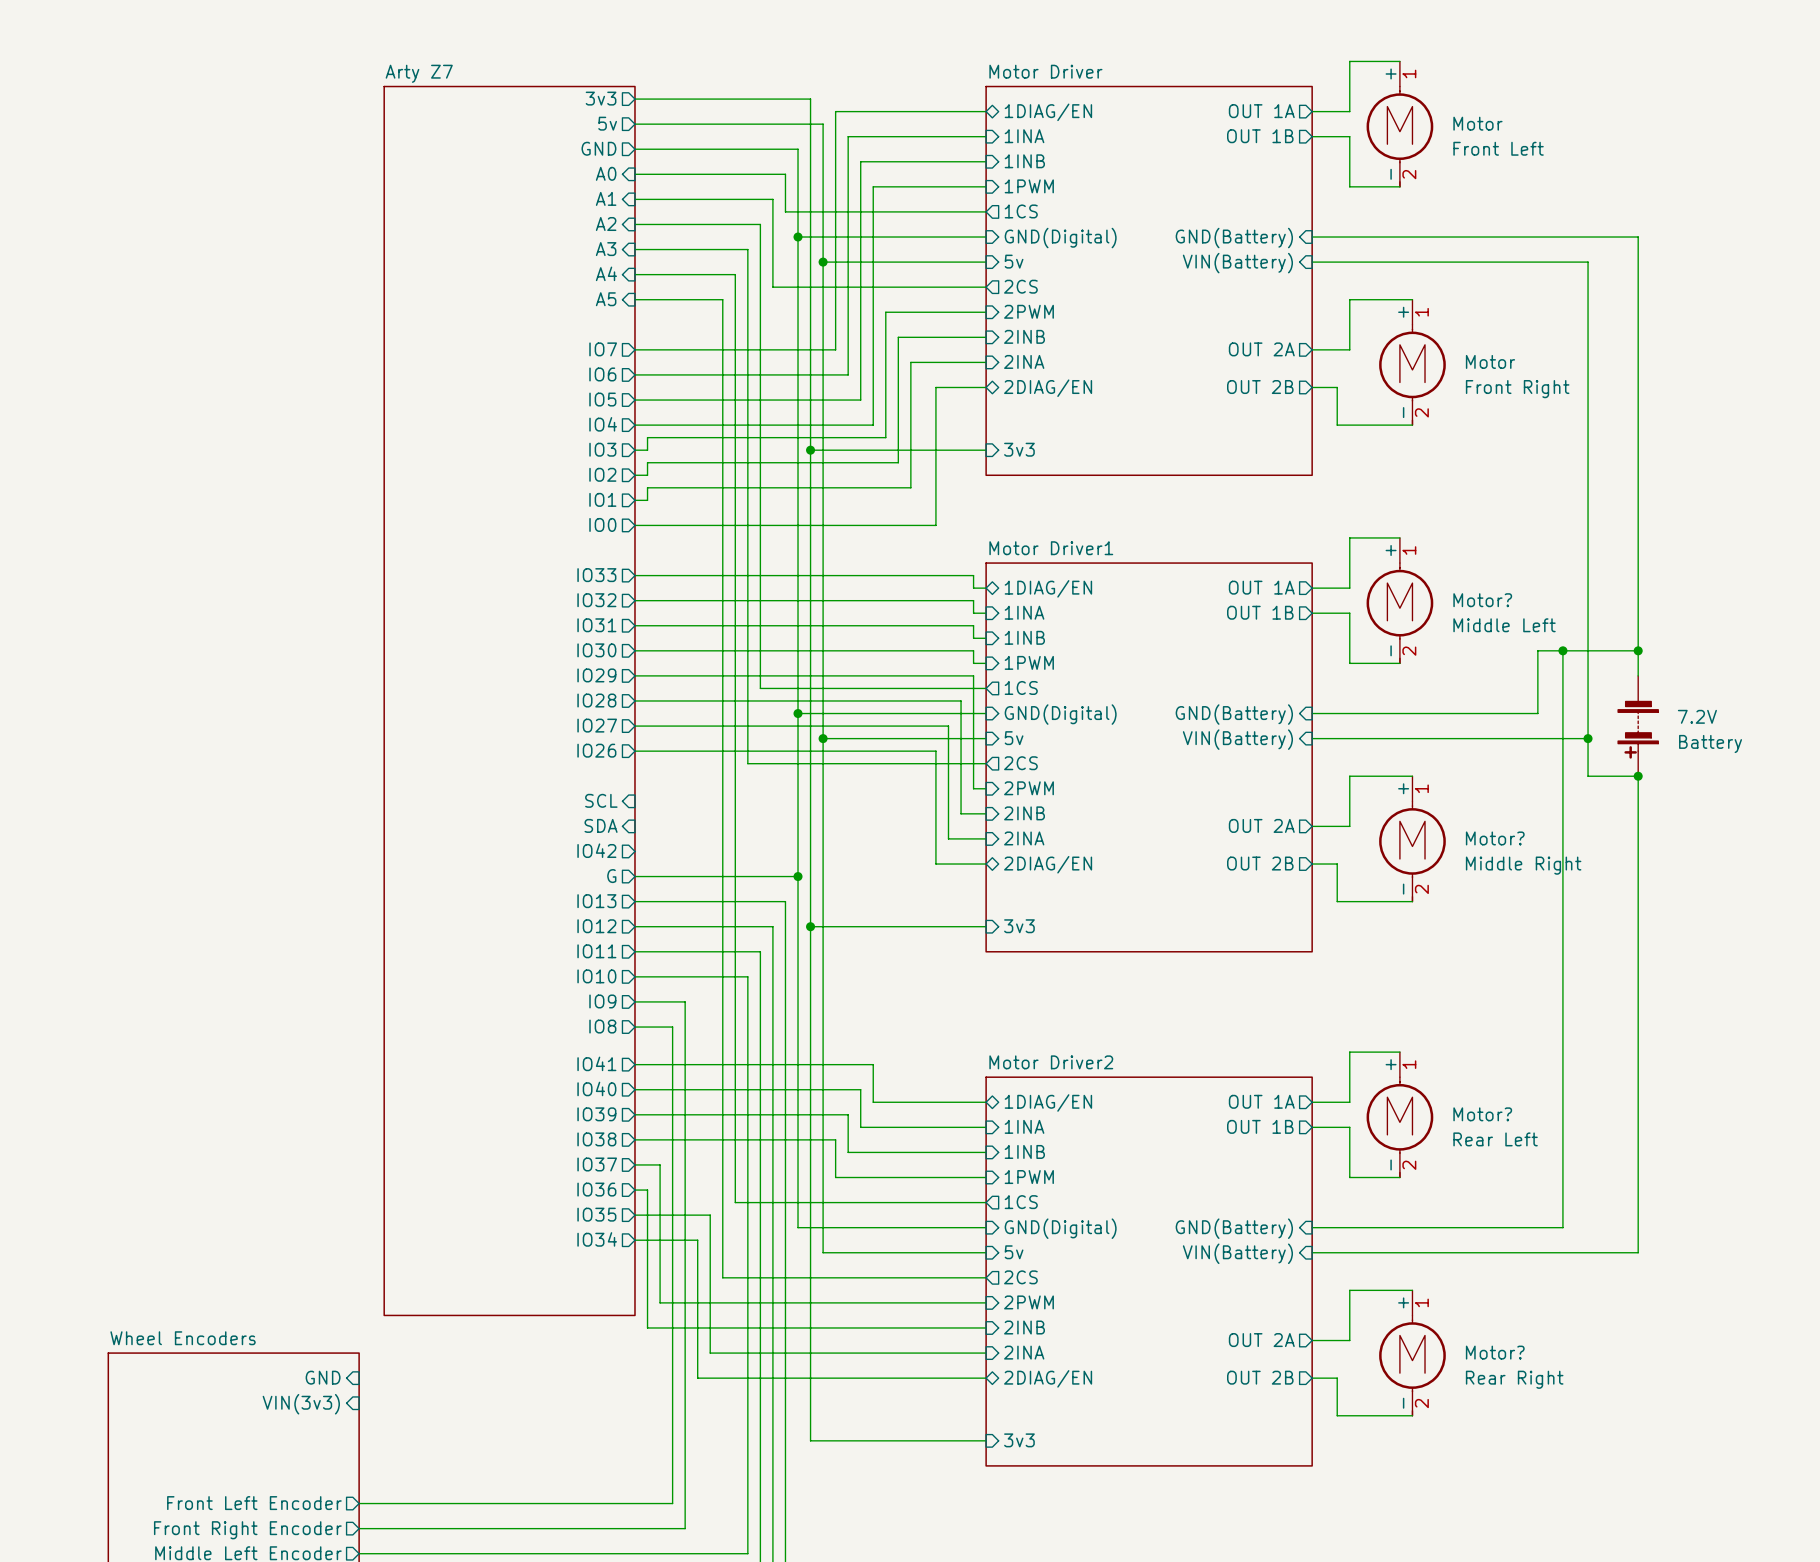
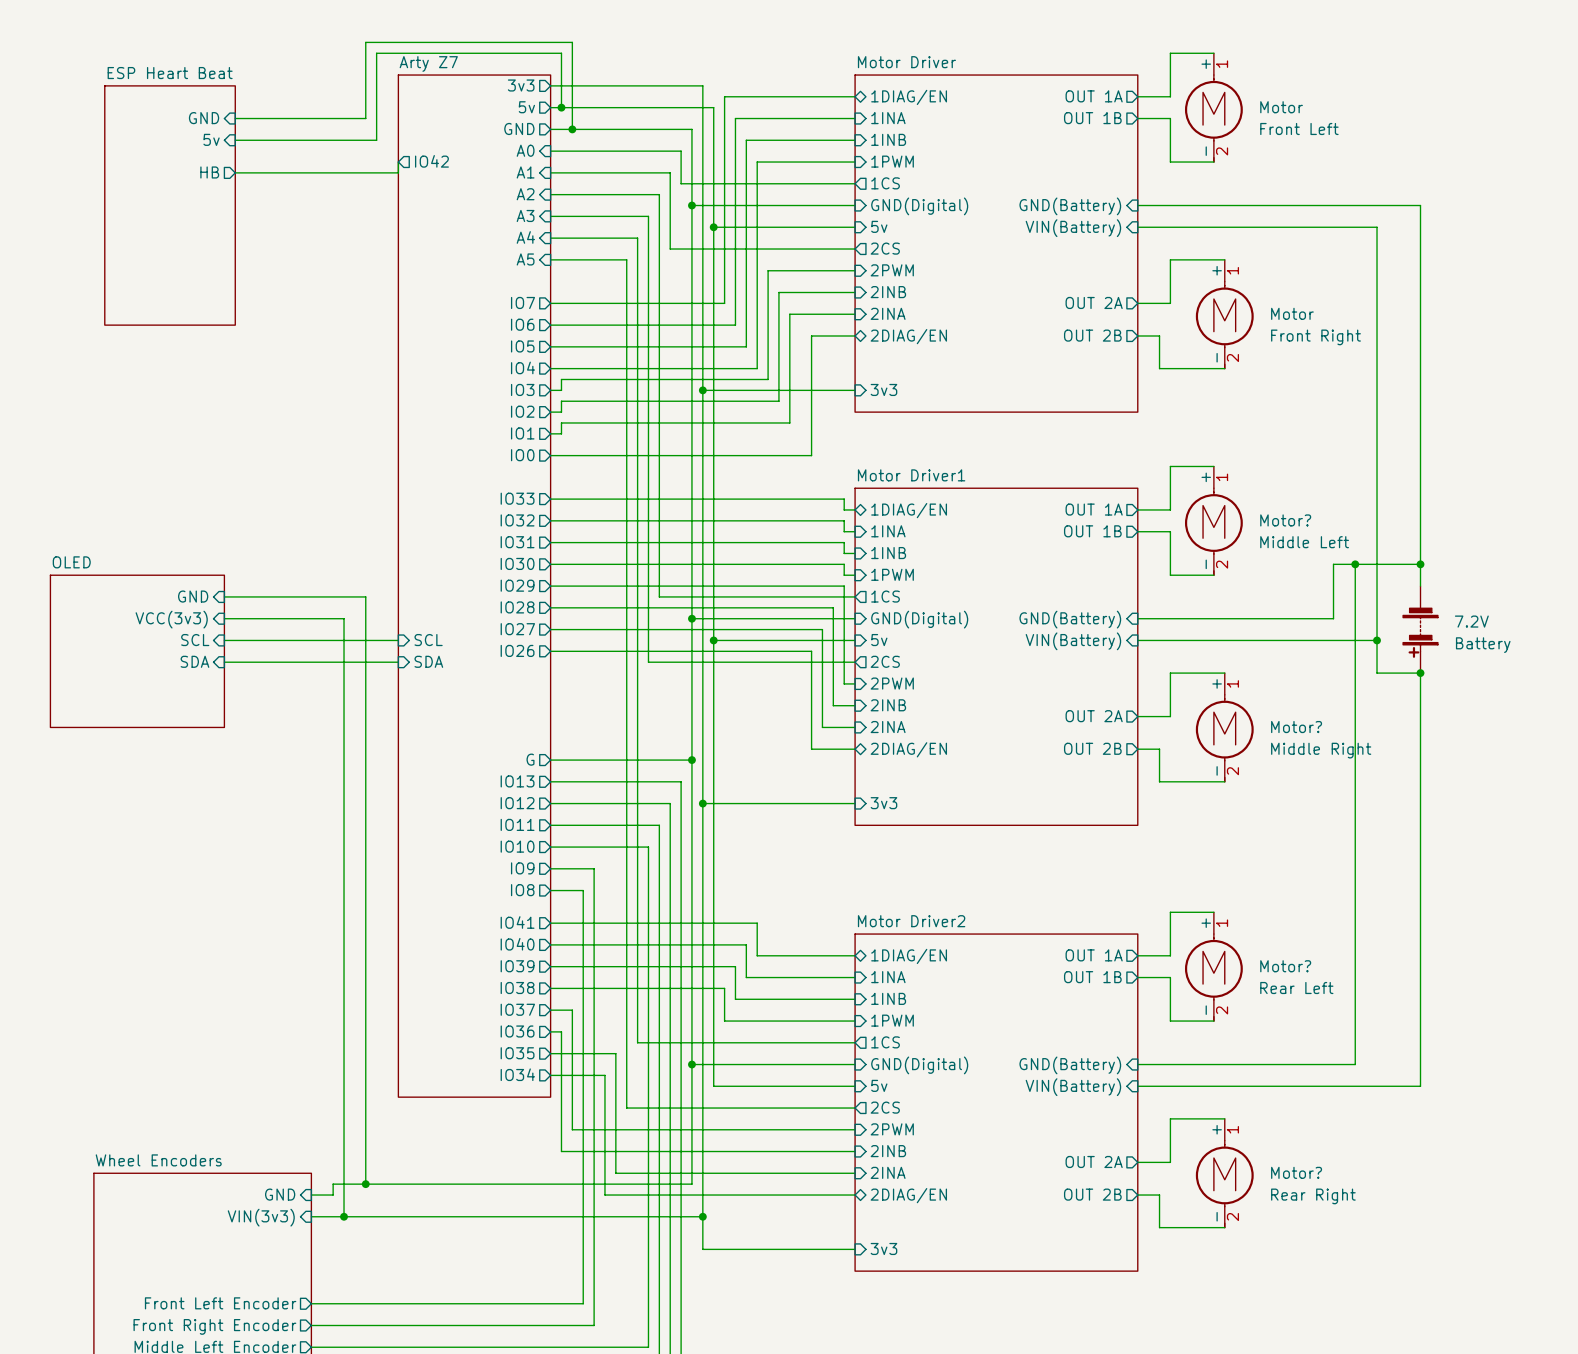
sheet Arty Z7 name position: Arty Z7 (419, 73) -> Arty Z7 (428, 63)
sheet Arty Z7 shape: [383, 85, 636, 1317] -> [397, 74, 552, 1098]
wire: none -> (561, 107) (561, 53) (376, 53) (376, 140) (235, 140)
junction: none -> (561, 107)
sheet pin: none -> GND (204, 118)
wire: none -> (235, 118) (365, 118) (365, 42) (572, 42) (572, 129)
junction: none -> (572, 129)
sheet pin: none -> 5v (211, 139)
wire: none -> (398, 162) (398, 172) (235, 172)
sheet pin: none -> IO42 (431, 161)
sheet pin: none -> HB (209, 172)
sheet ESP Heart Beat: none -> (170, 205)
sheet pin: none -> GND (193, 596)
wire: none -> (224, 596) (365, 596) (365, 1184)
wire: none -> (224, 618) (344, 618) (344, 1216)
sheet pin: none -> VCC(3v3) (171, 619)
sheet pin: none -> SCL (195, 640)
wire: none -> (224, 640) (398, 640)
sheet OLED: none -> (137, 651)
sheet pin: none -> SDA (194, 661)
wire: none -> (224, 662) (398, 662)
sheet pin rotation: 0° (601, 800) -> 180° (428, 640)
sheet pin position: SCL (601, 800) -> SCL (428, 640)
sheet pin rotation: 0° (601, 825) -> 180° (428, 661)
sheet pin position: SDA (601, 825) -> SDA (428, 661)
sheet pin: IO42 (596, 850) -> none
wire: none -> (691, 1064) (691, 1184) (333, 1184) (333, 1195) (311, 1195)
junction: none -> (691, 1064)
junction: none -> (365, 1184)
wire: none -> (311, 1216) (702, 1216)
junction: none -> (344, 1216)
junction: none -> (702, 1216)

